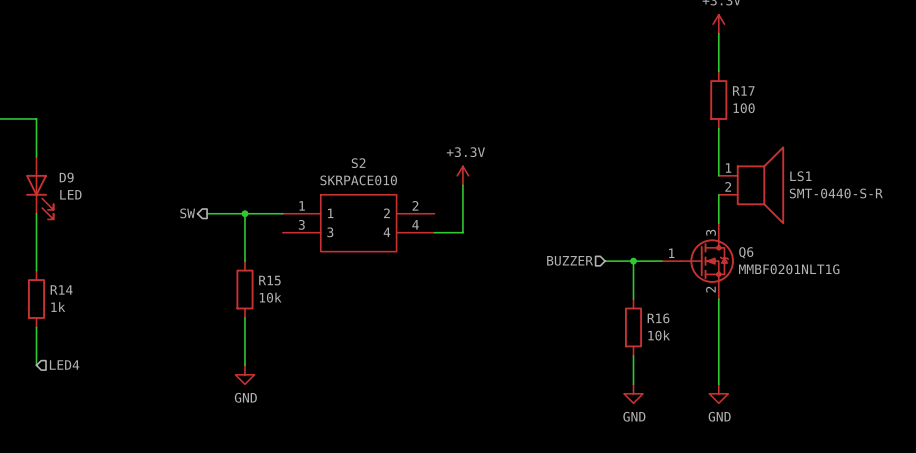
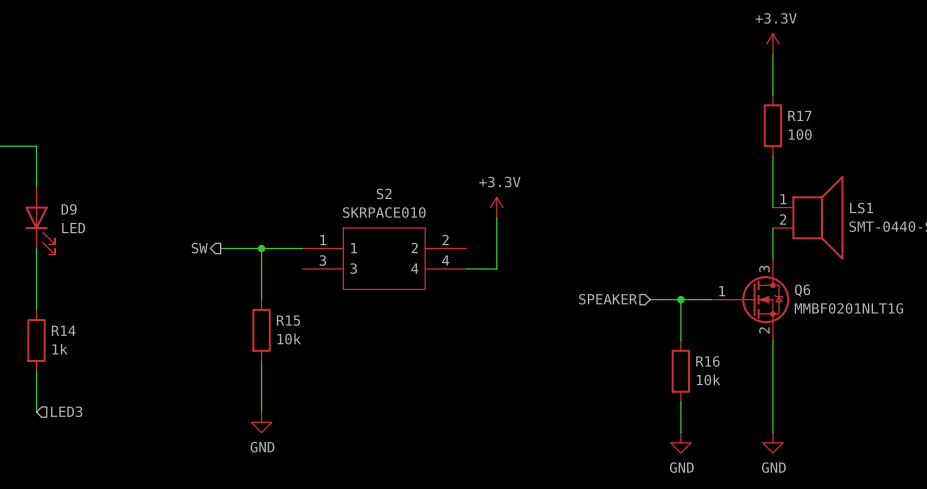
hierarchical label: BUZZER (570, 260) -> SPEAKER (608, 299)
hierarchical label: LED4 (64, 365) -> LED3 (66, 411)

